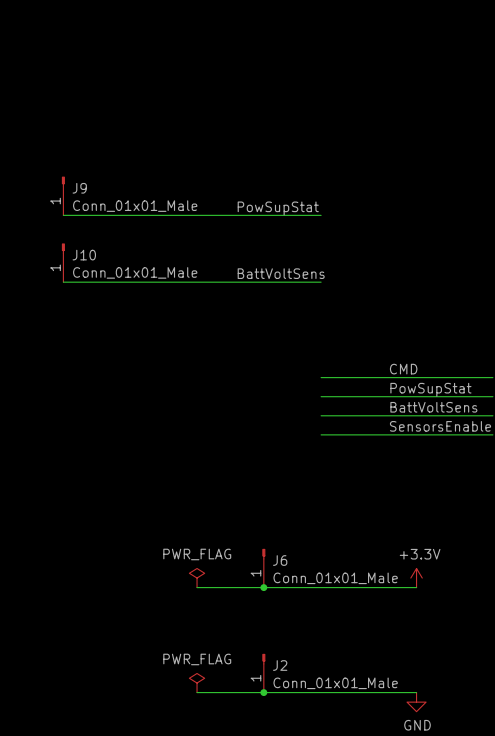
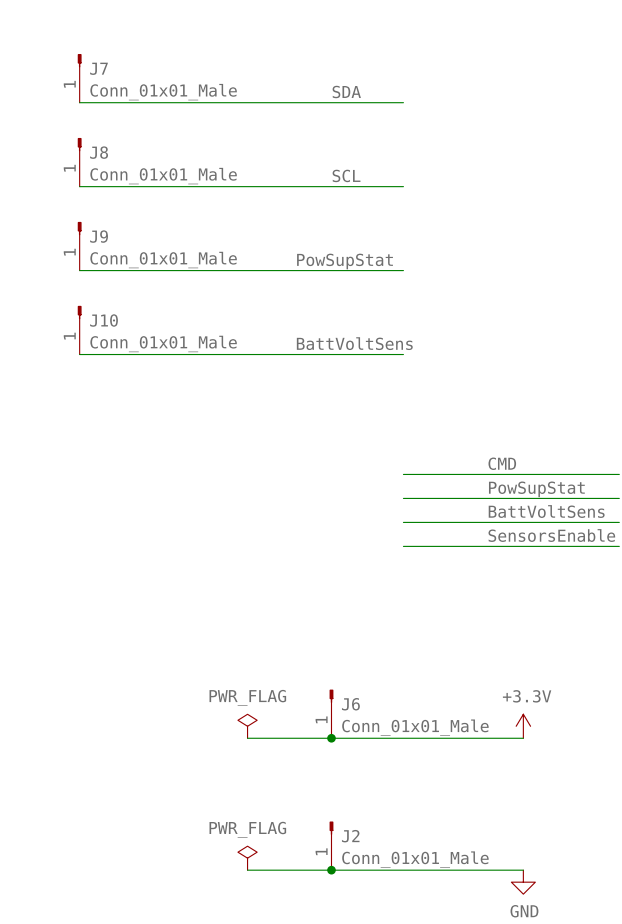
J7: none -> Conn_01x01_Male (79, 78)
label: none -> SDA (346, 92)
wire: none -> (79, 102) (403, 102)
J8: none -> Conn_01x01_Male (79, 162)
label: none -> SCL (346, 175)
wire: none -> (79, 186) (403, 186)

